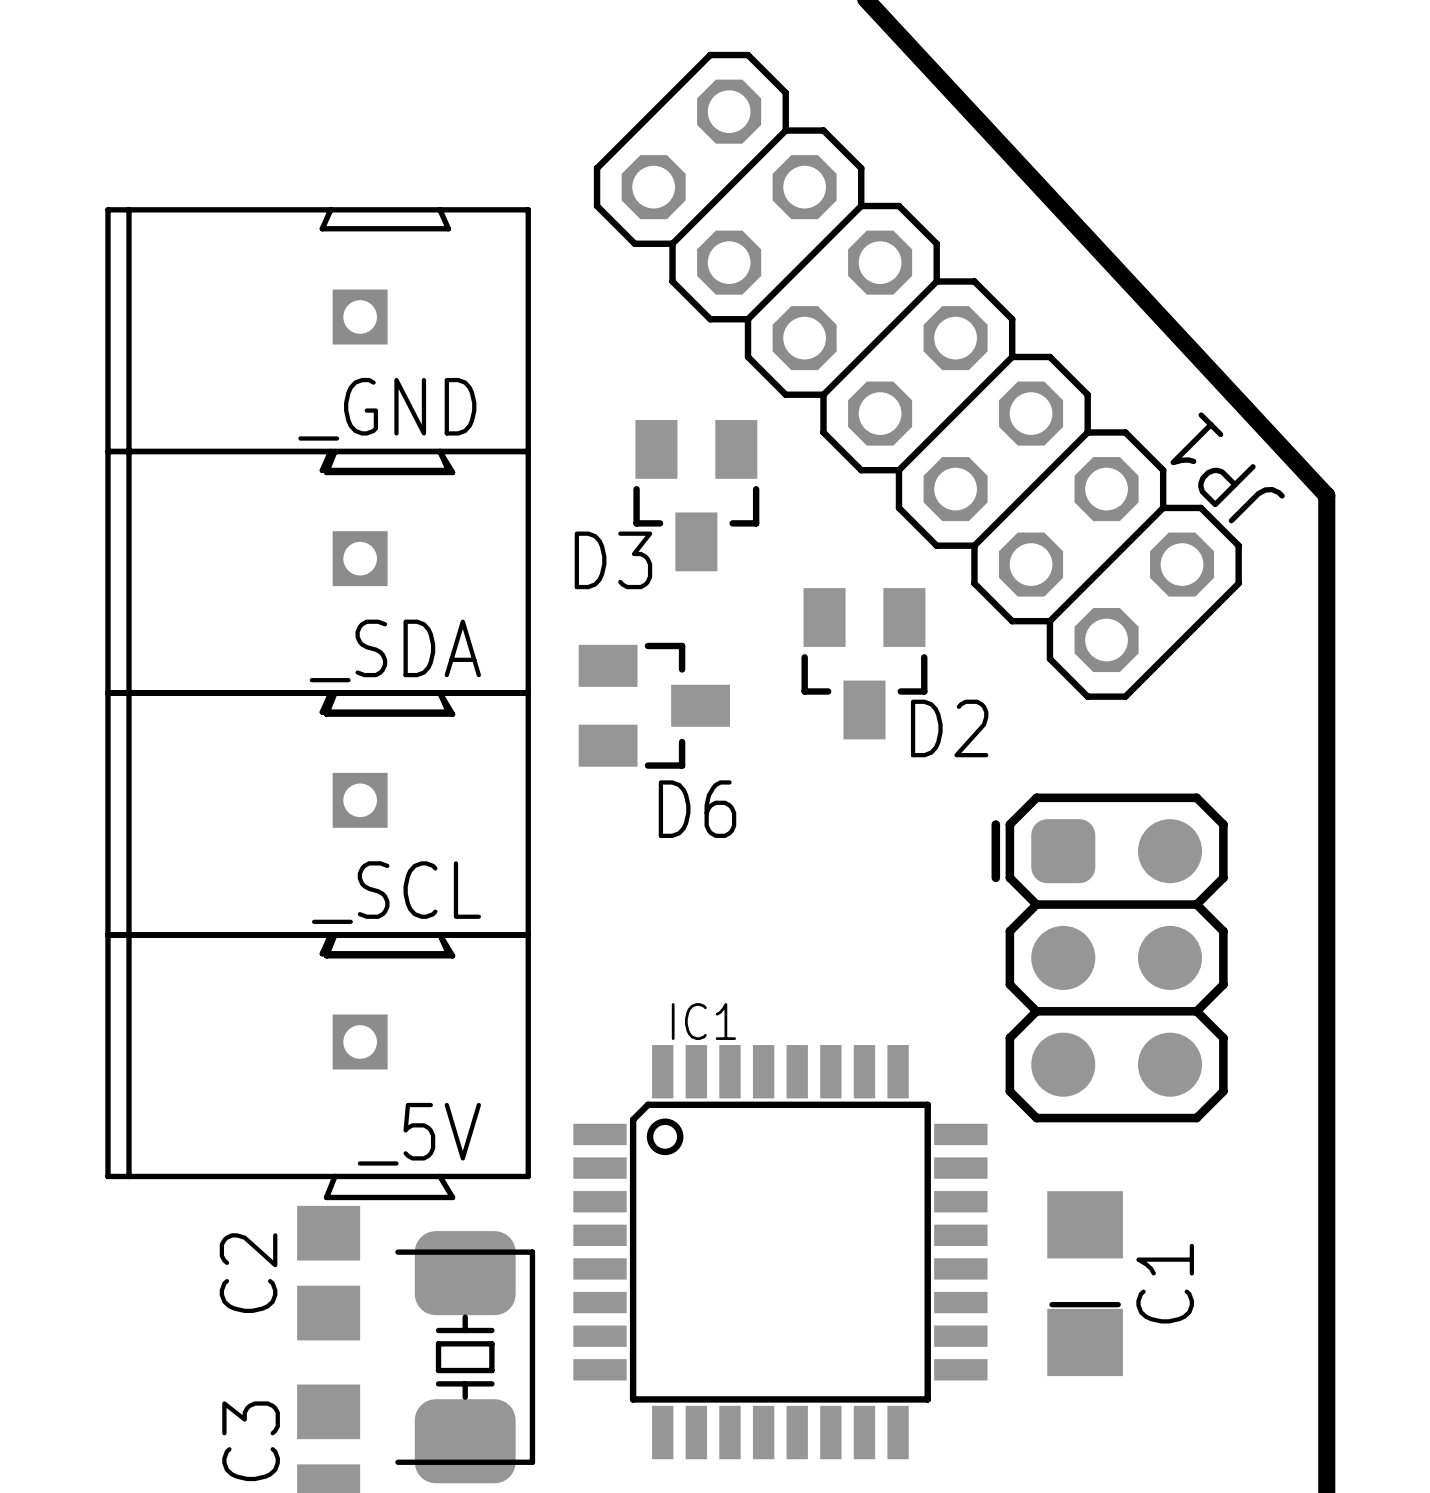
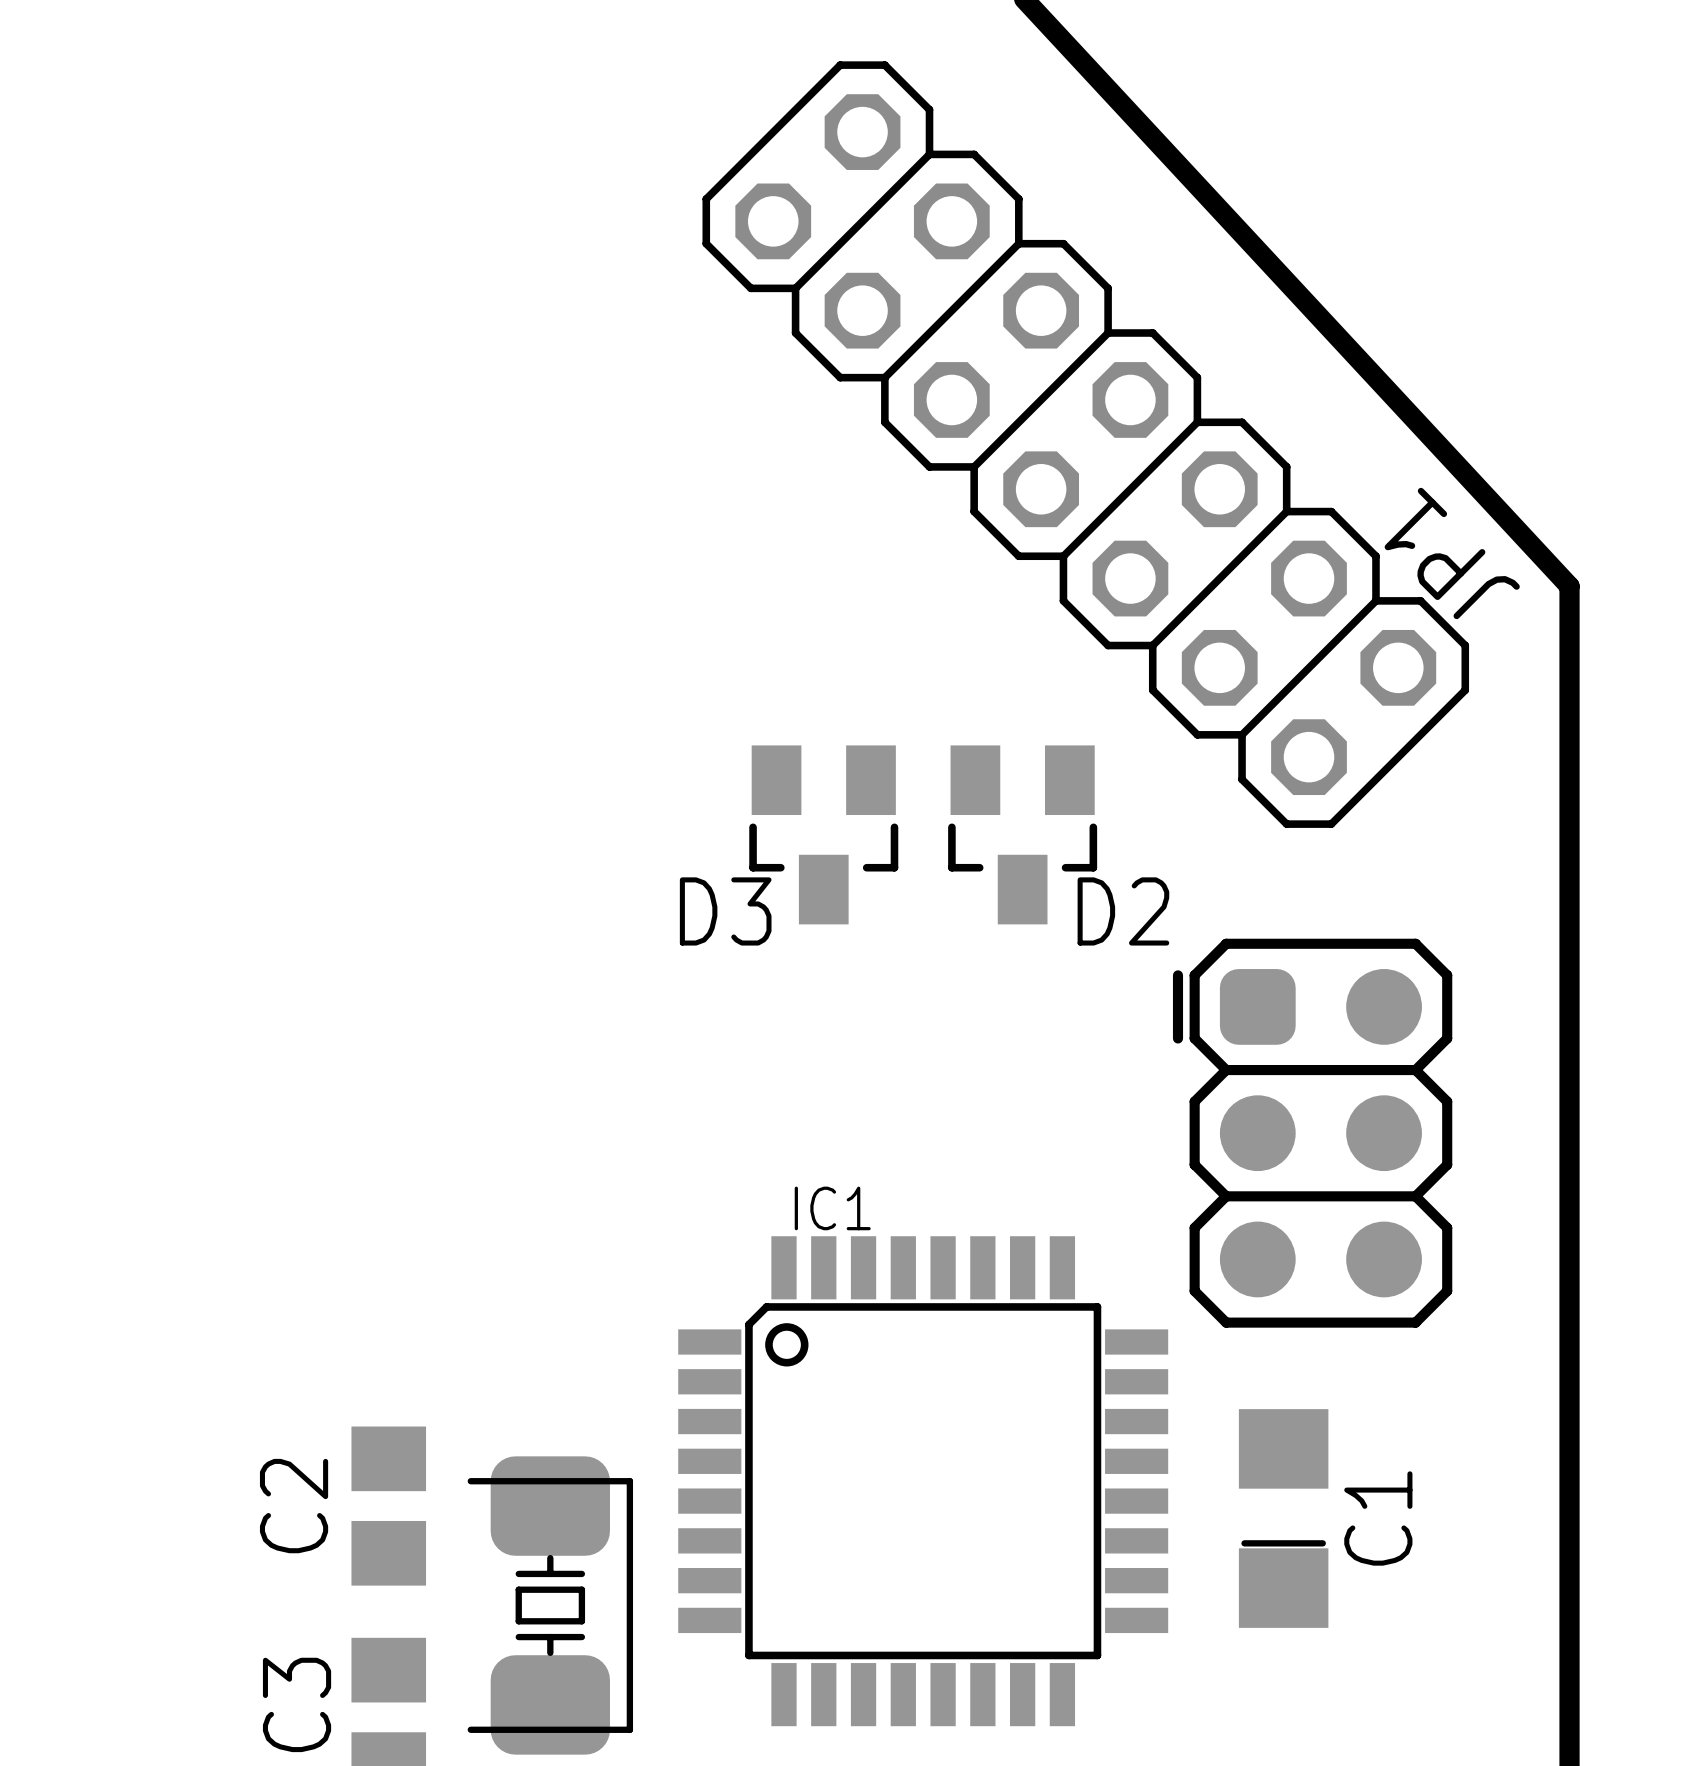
_GND: (318, 341) -> none
D3 position: (696, 495) -> (823, 834)
_SDA: (318, 582) -> none
D2 position: (864, 663) -> (1022, 834)
D6: (654, 705) -> none
_SCL: (318, 824) -> none
_5V: (318, 1066) -> none

